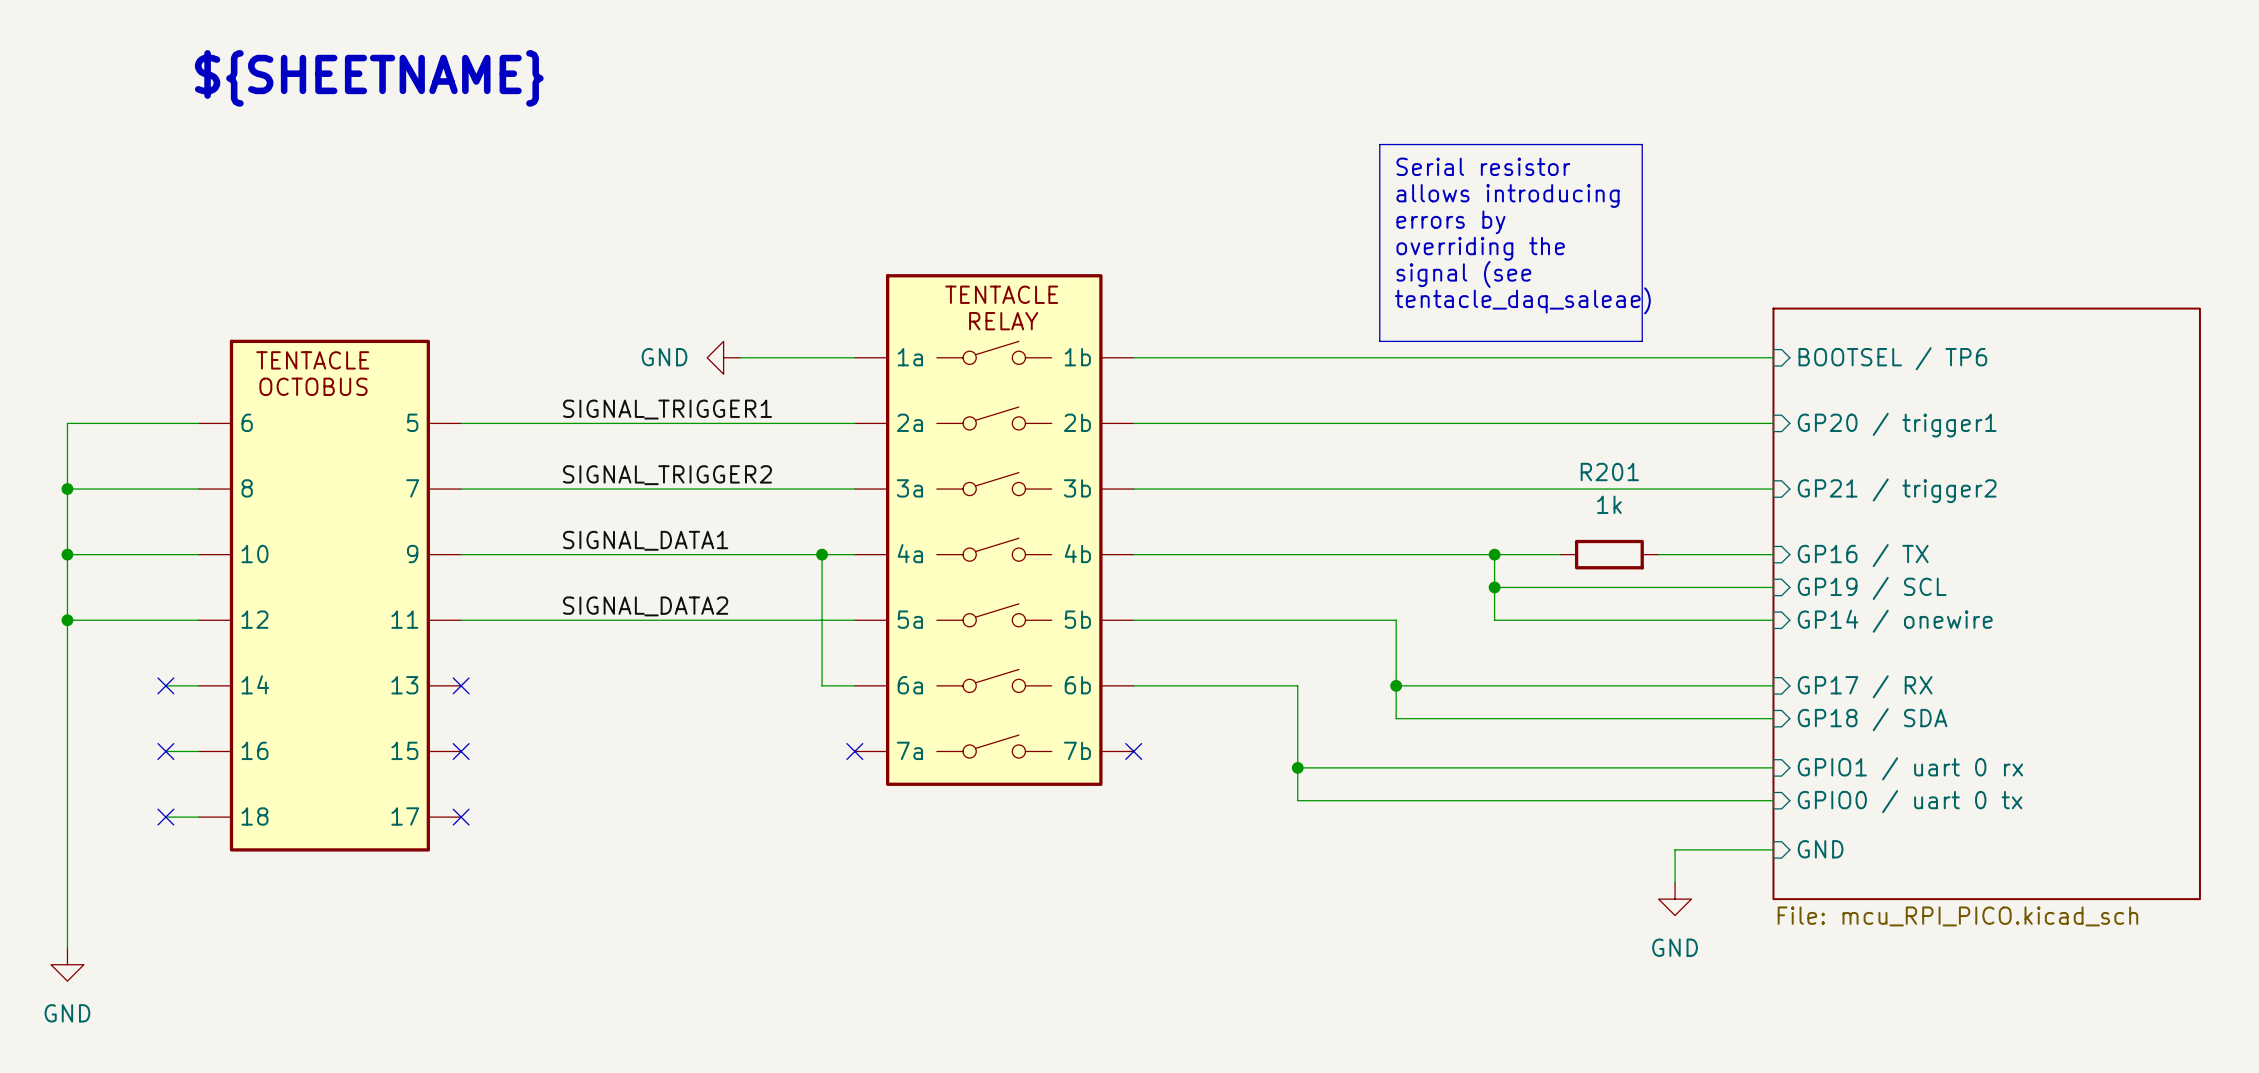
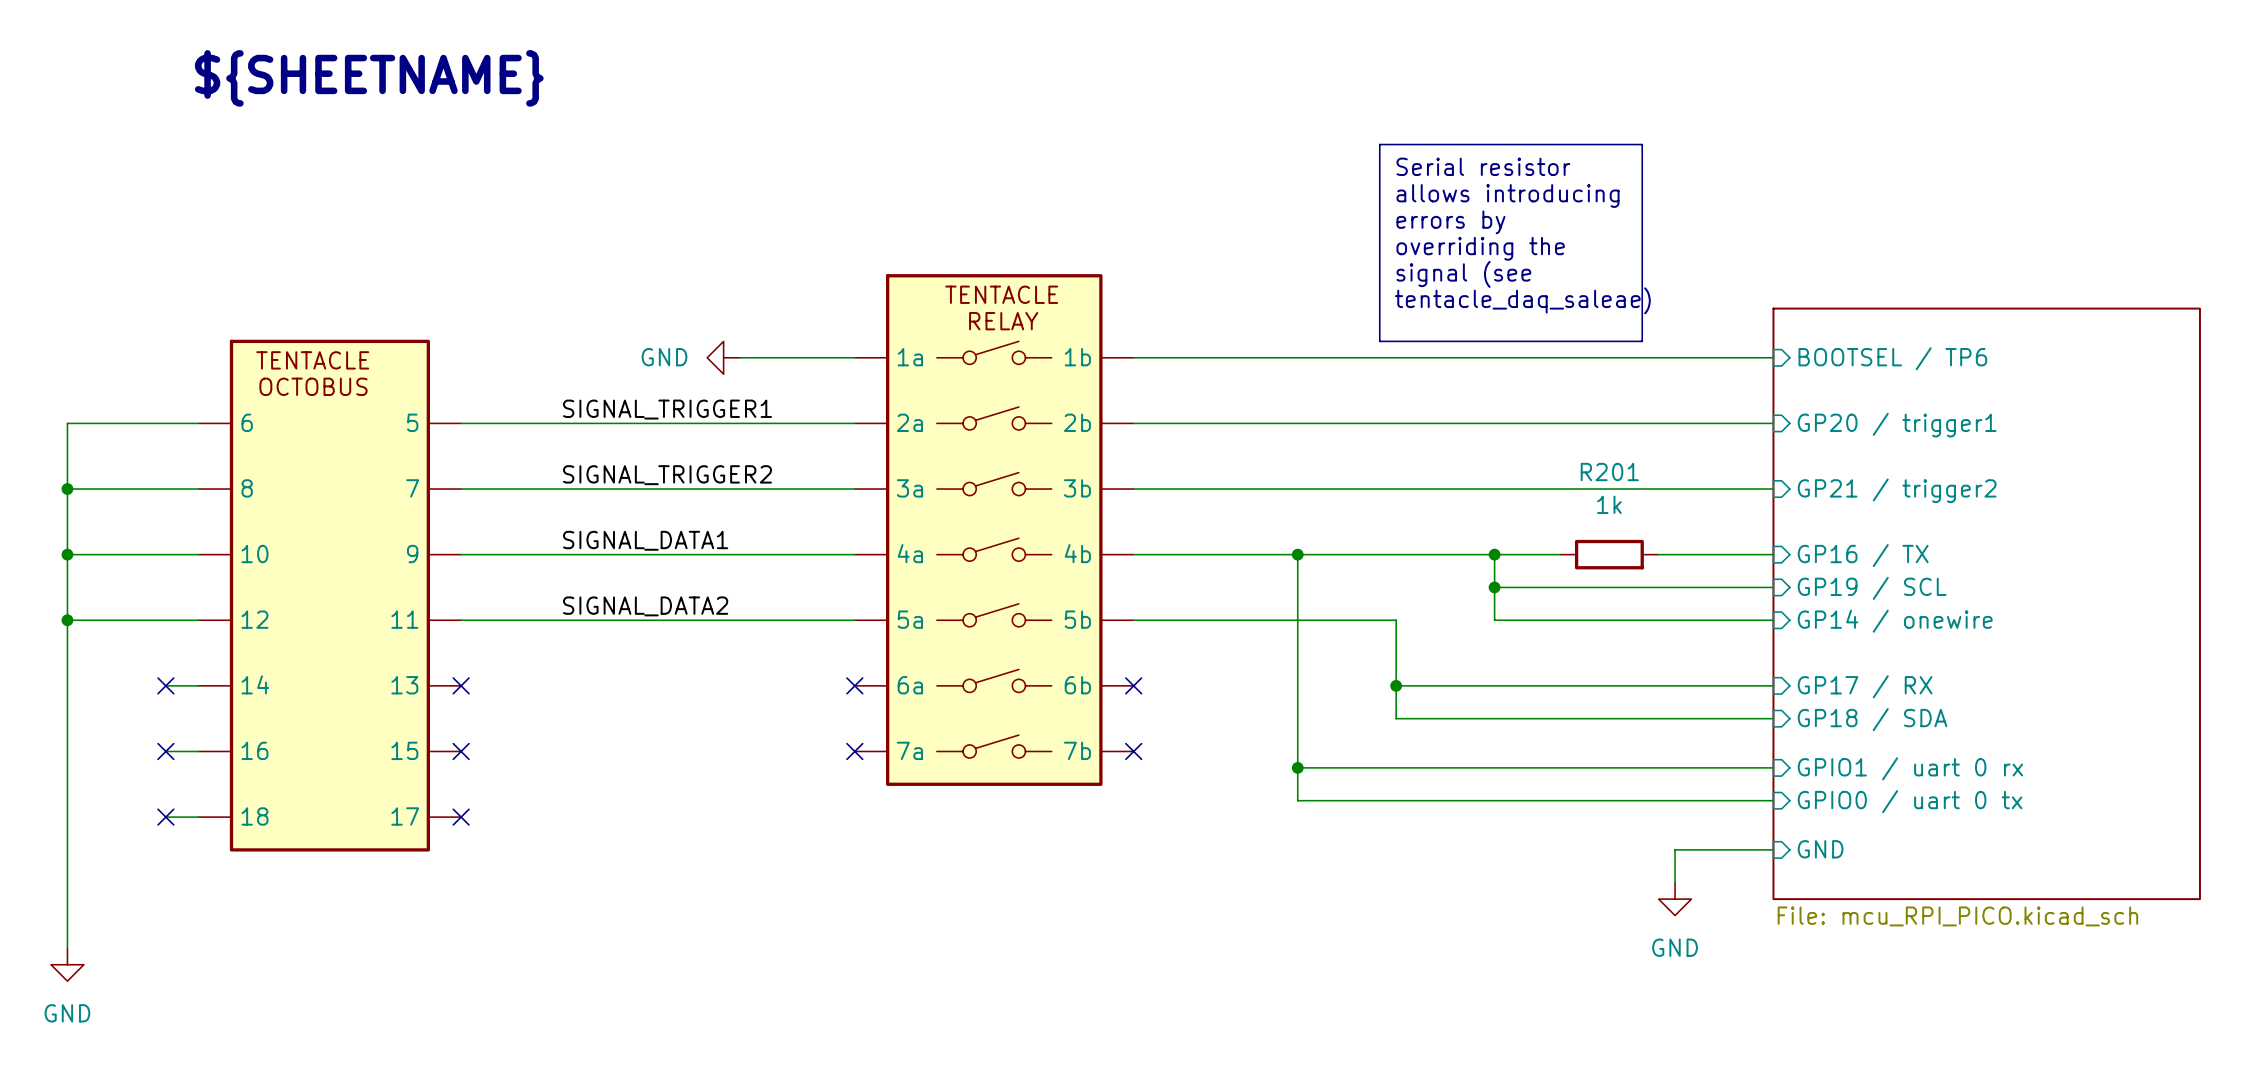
wire: (822, 554) (822, 685) (854, 685) -> none
junction: (822, 554) -> none
junction: none -> (1297, 554)
no-connect mark: none -> (854, 685)
wire: (1133, 685) (1297, 685) -> (1297, 554) (1297, 685)
no-connect mark: none -> (1133, 685)

